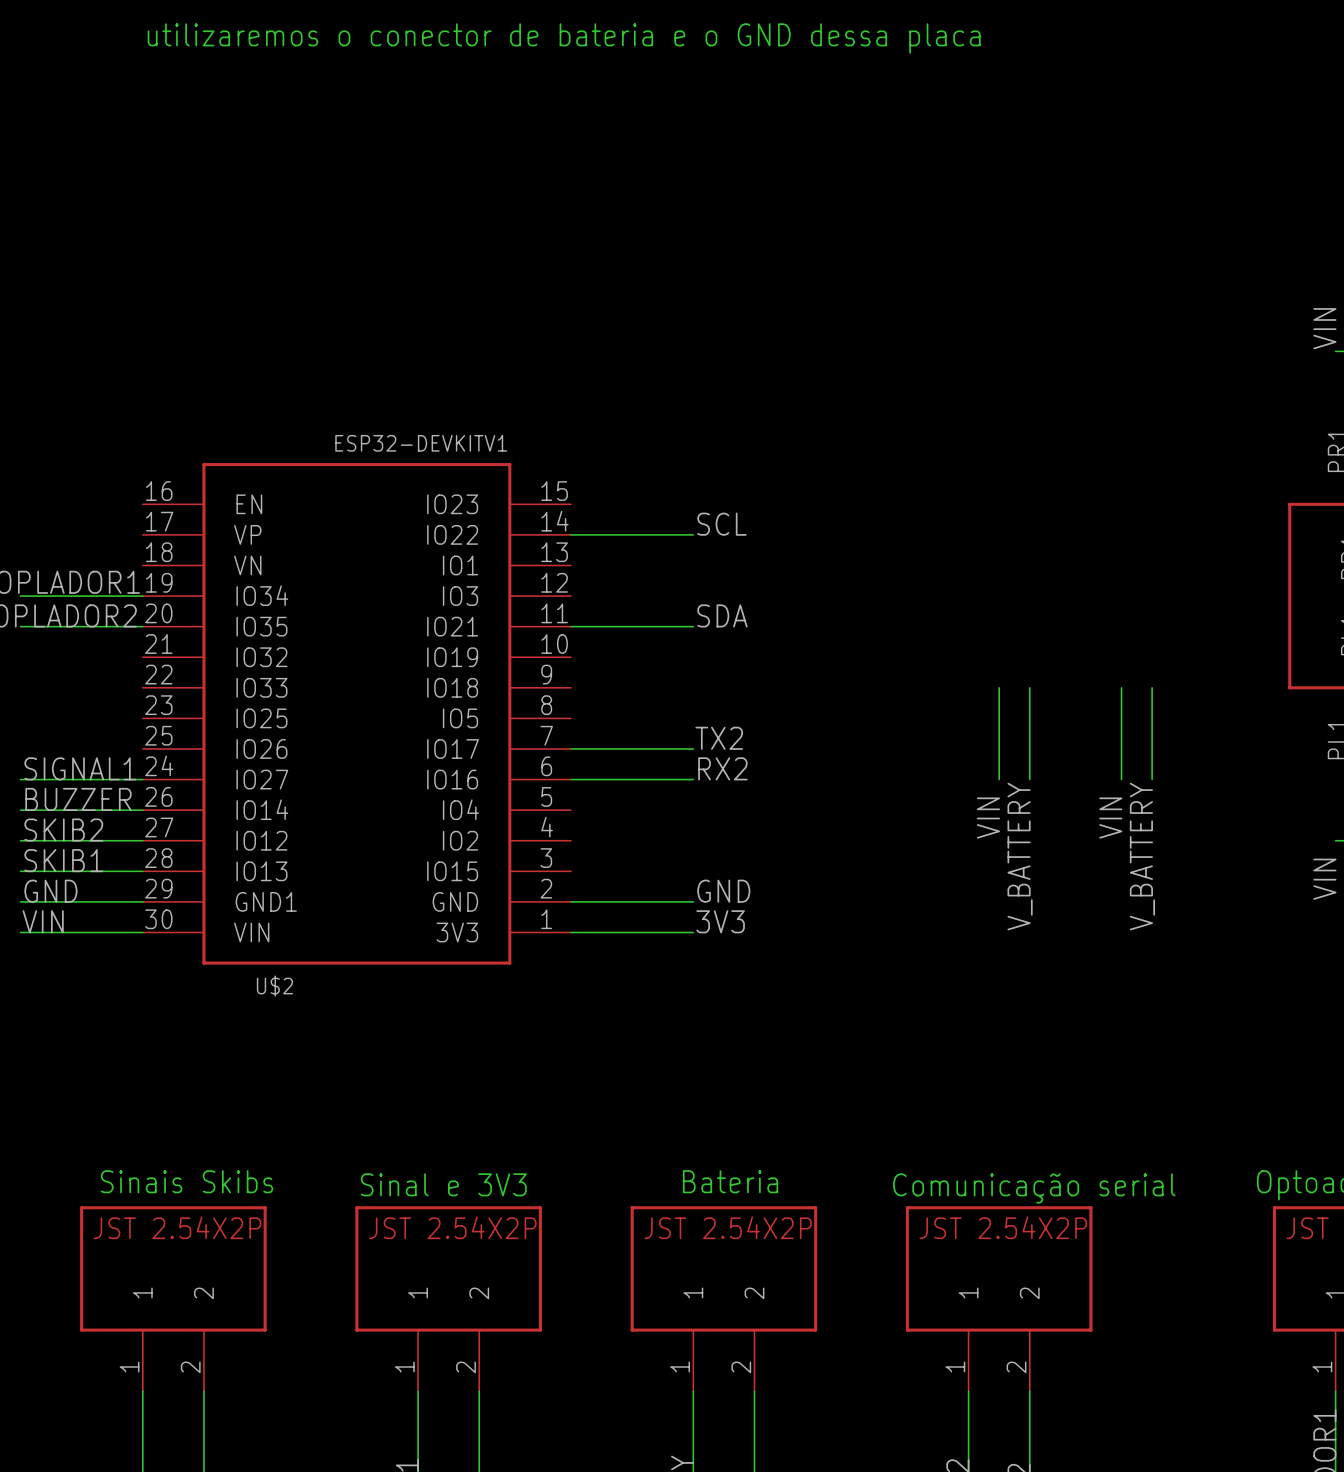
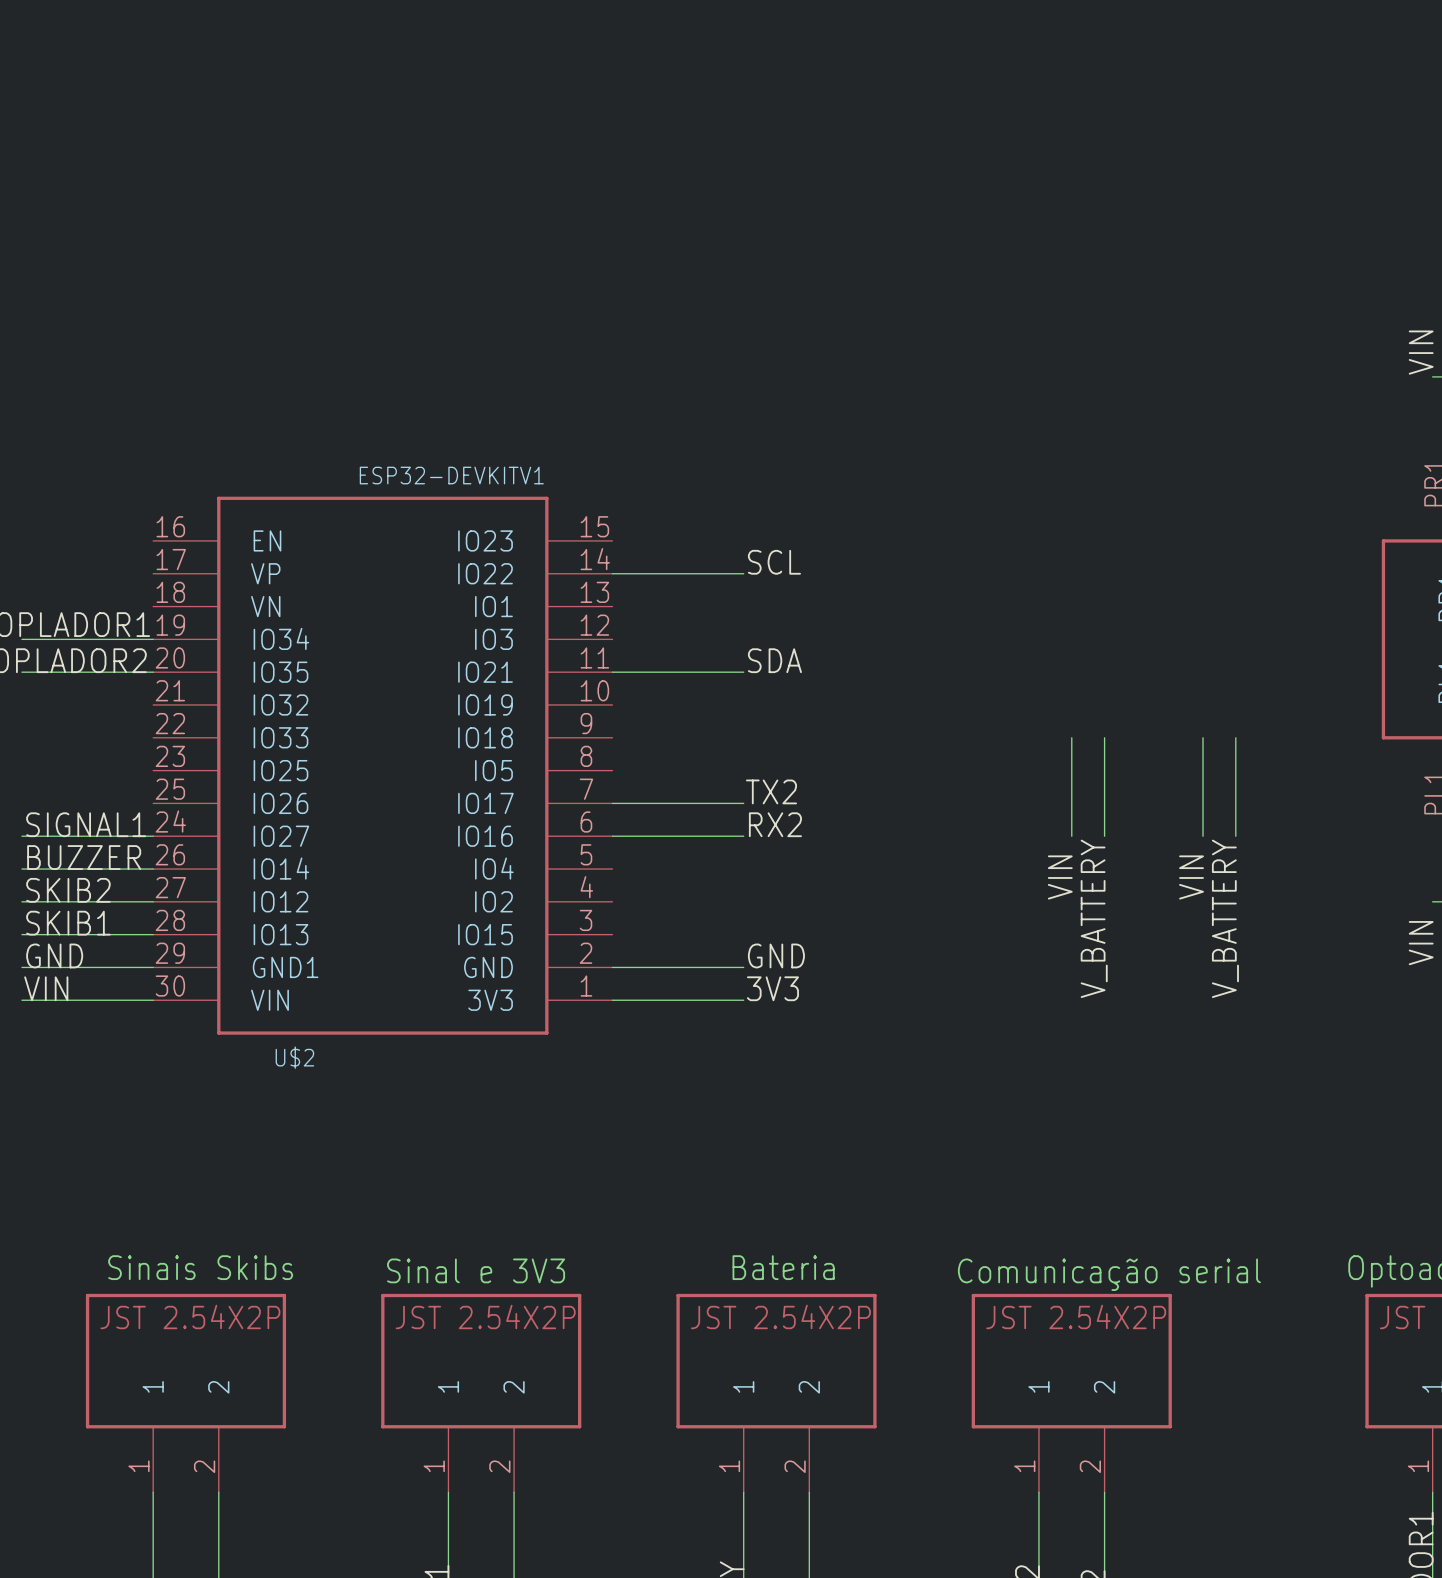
text: utilizaremos o conector de bateria e o GND dessa placa (564, 38) -> none

